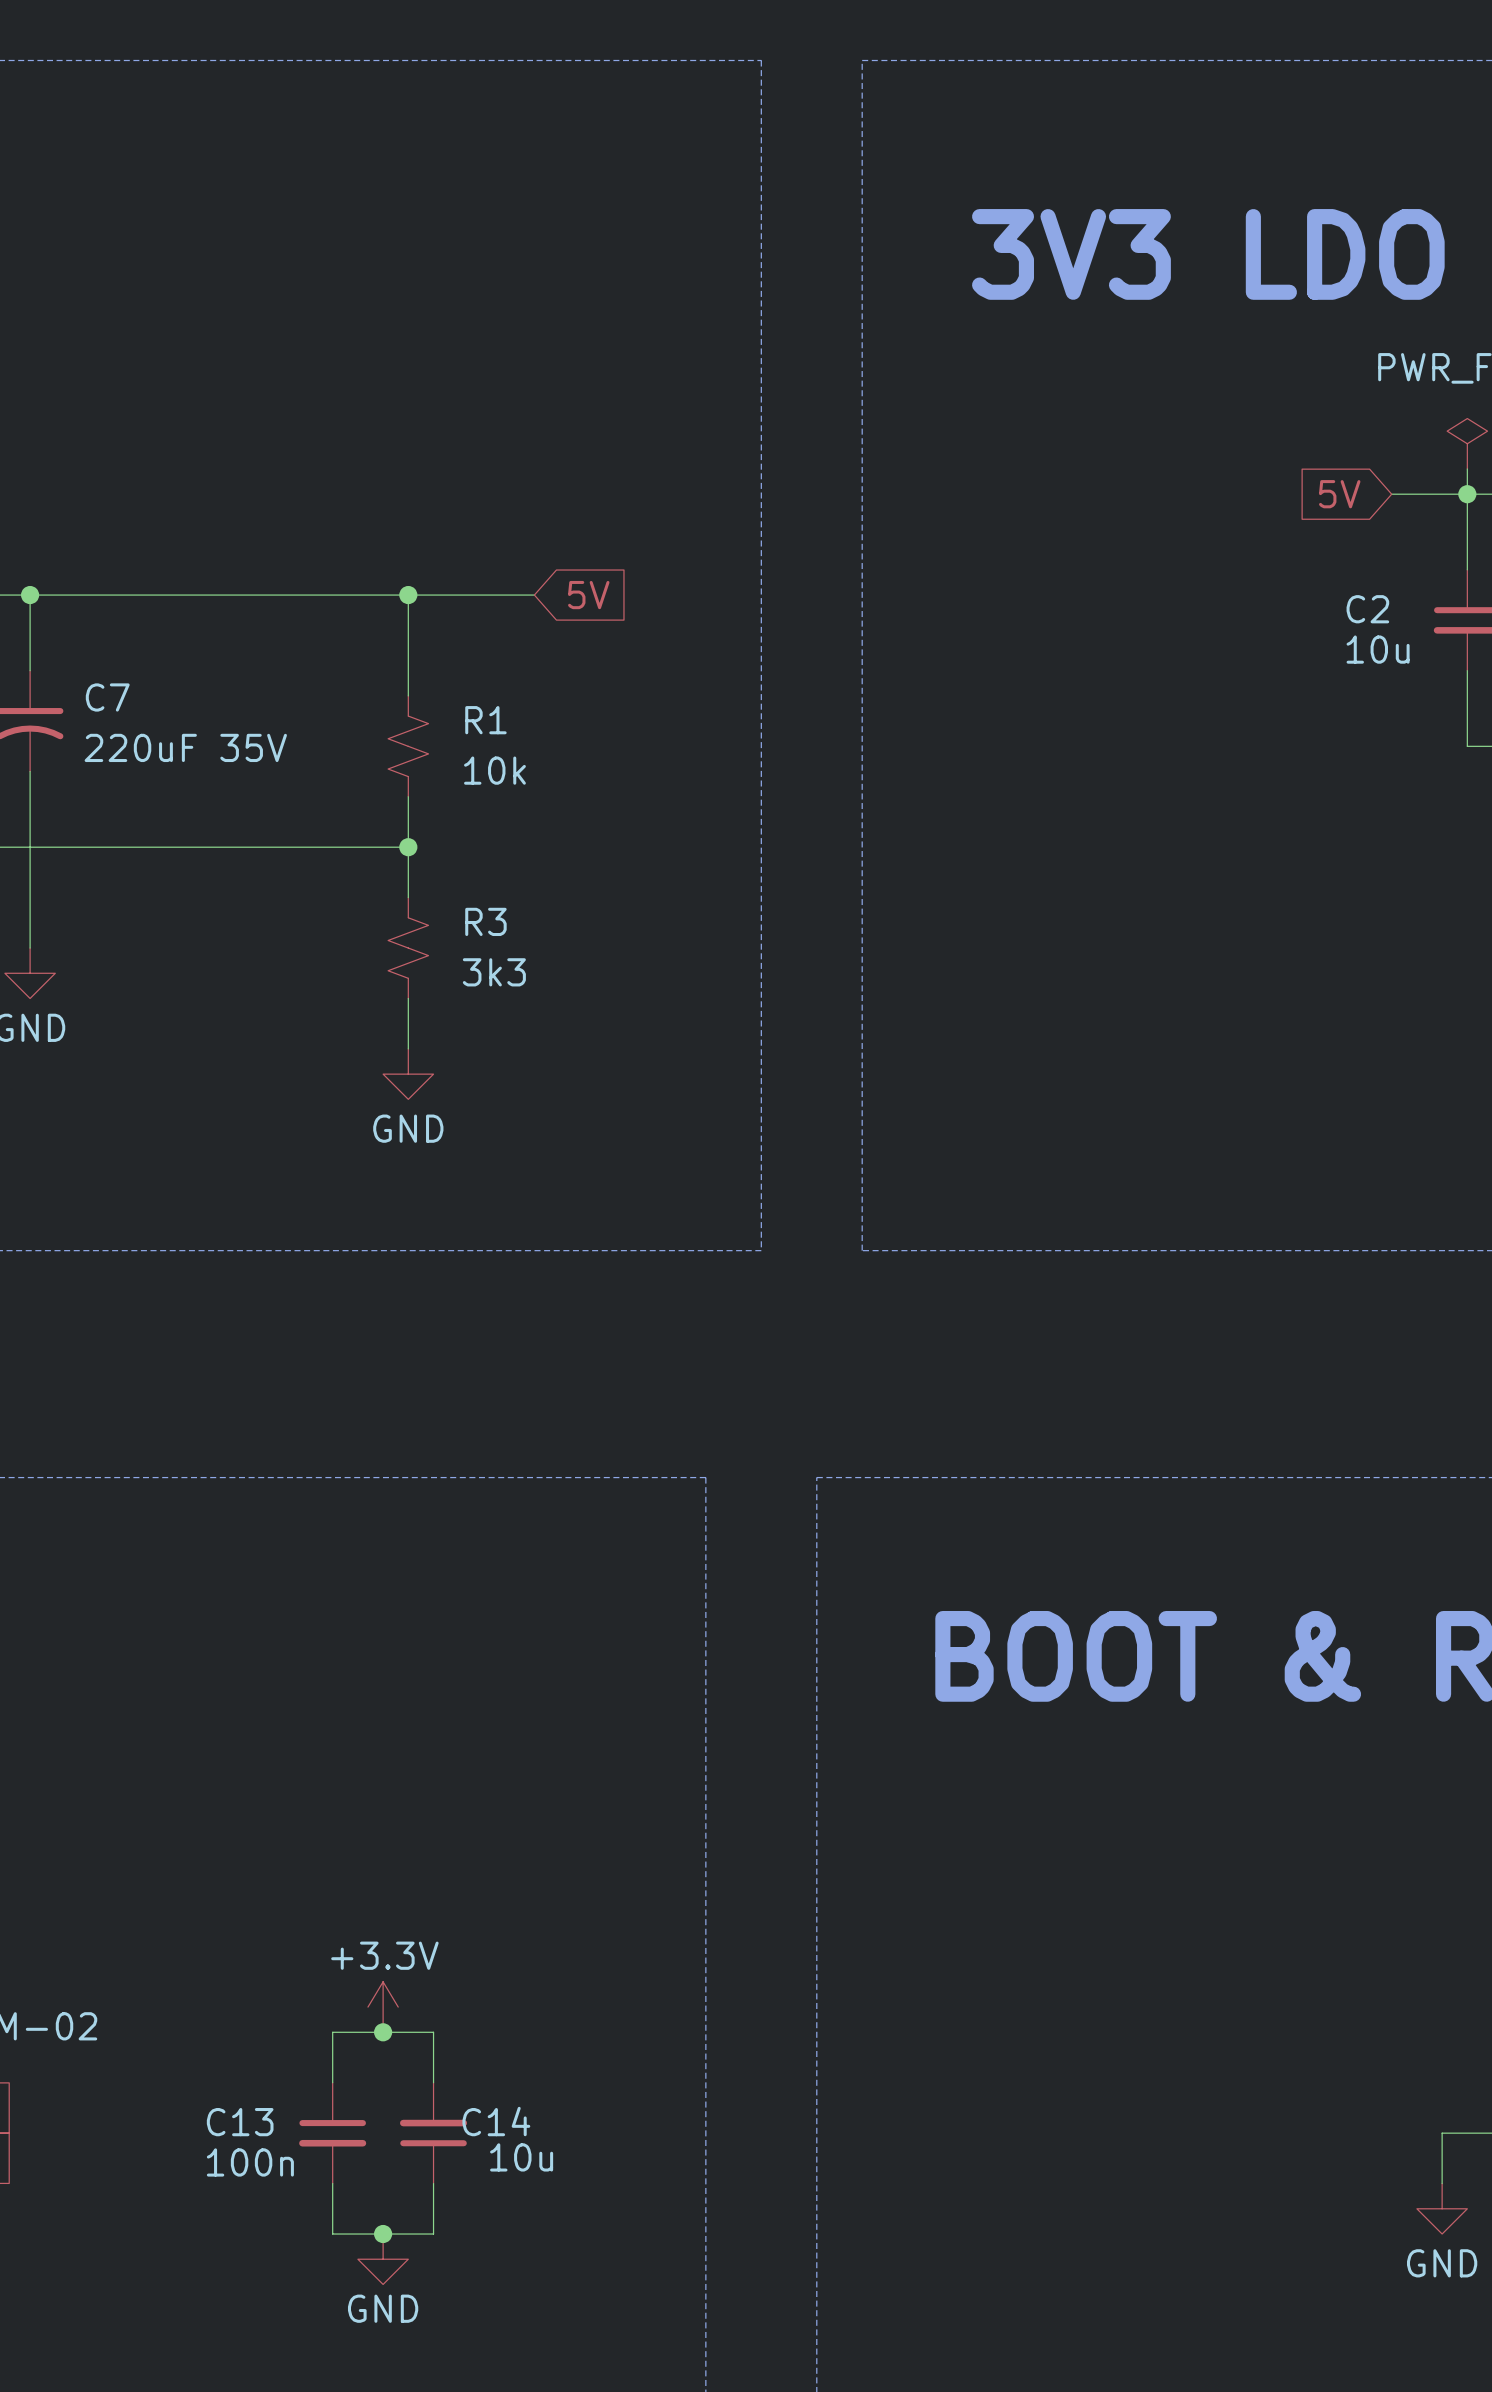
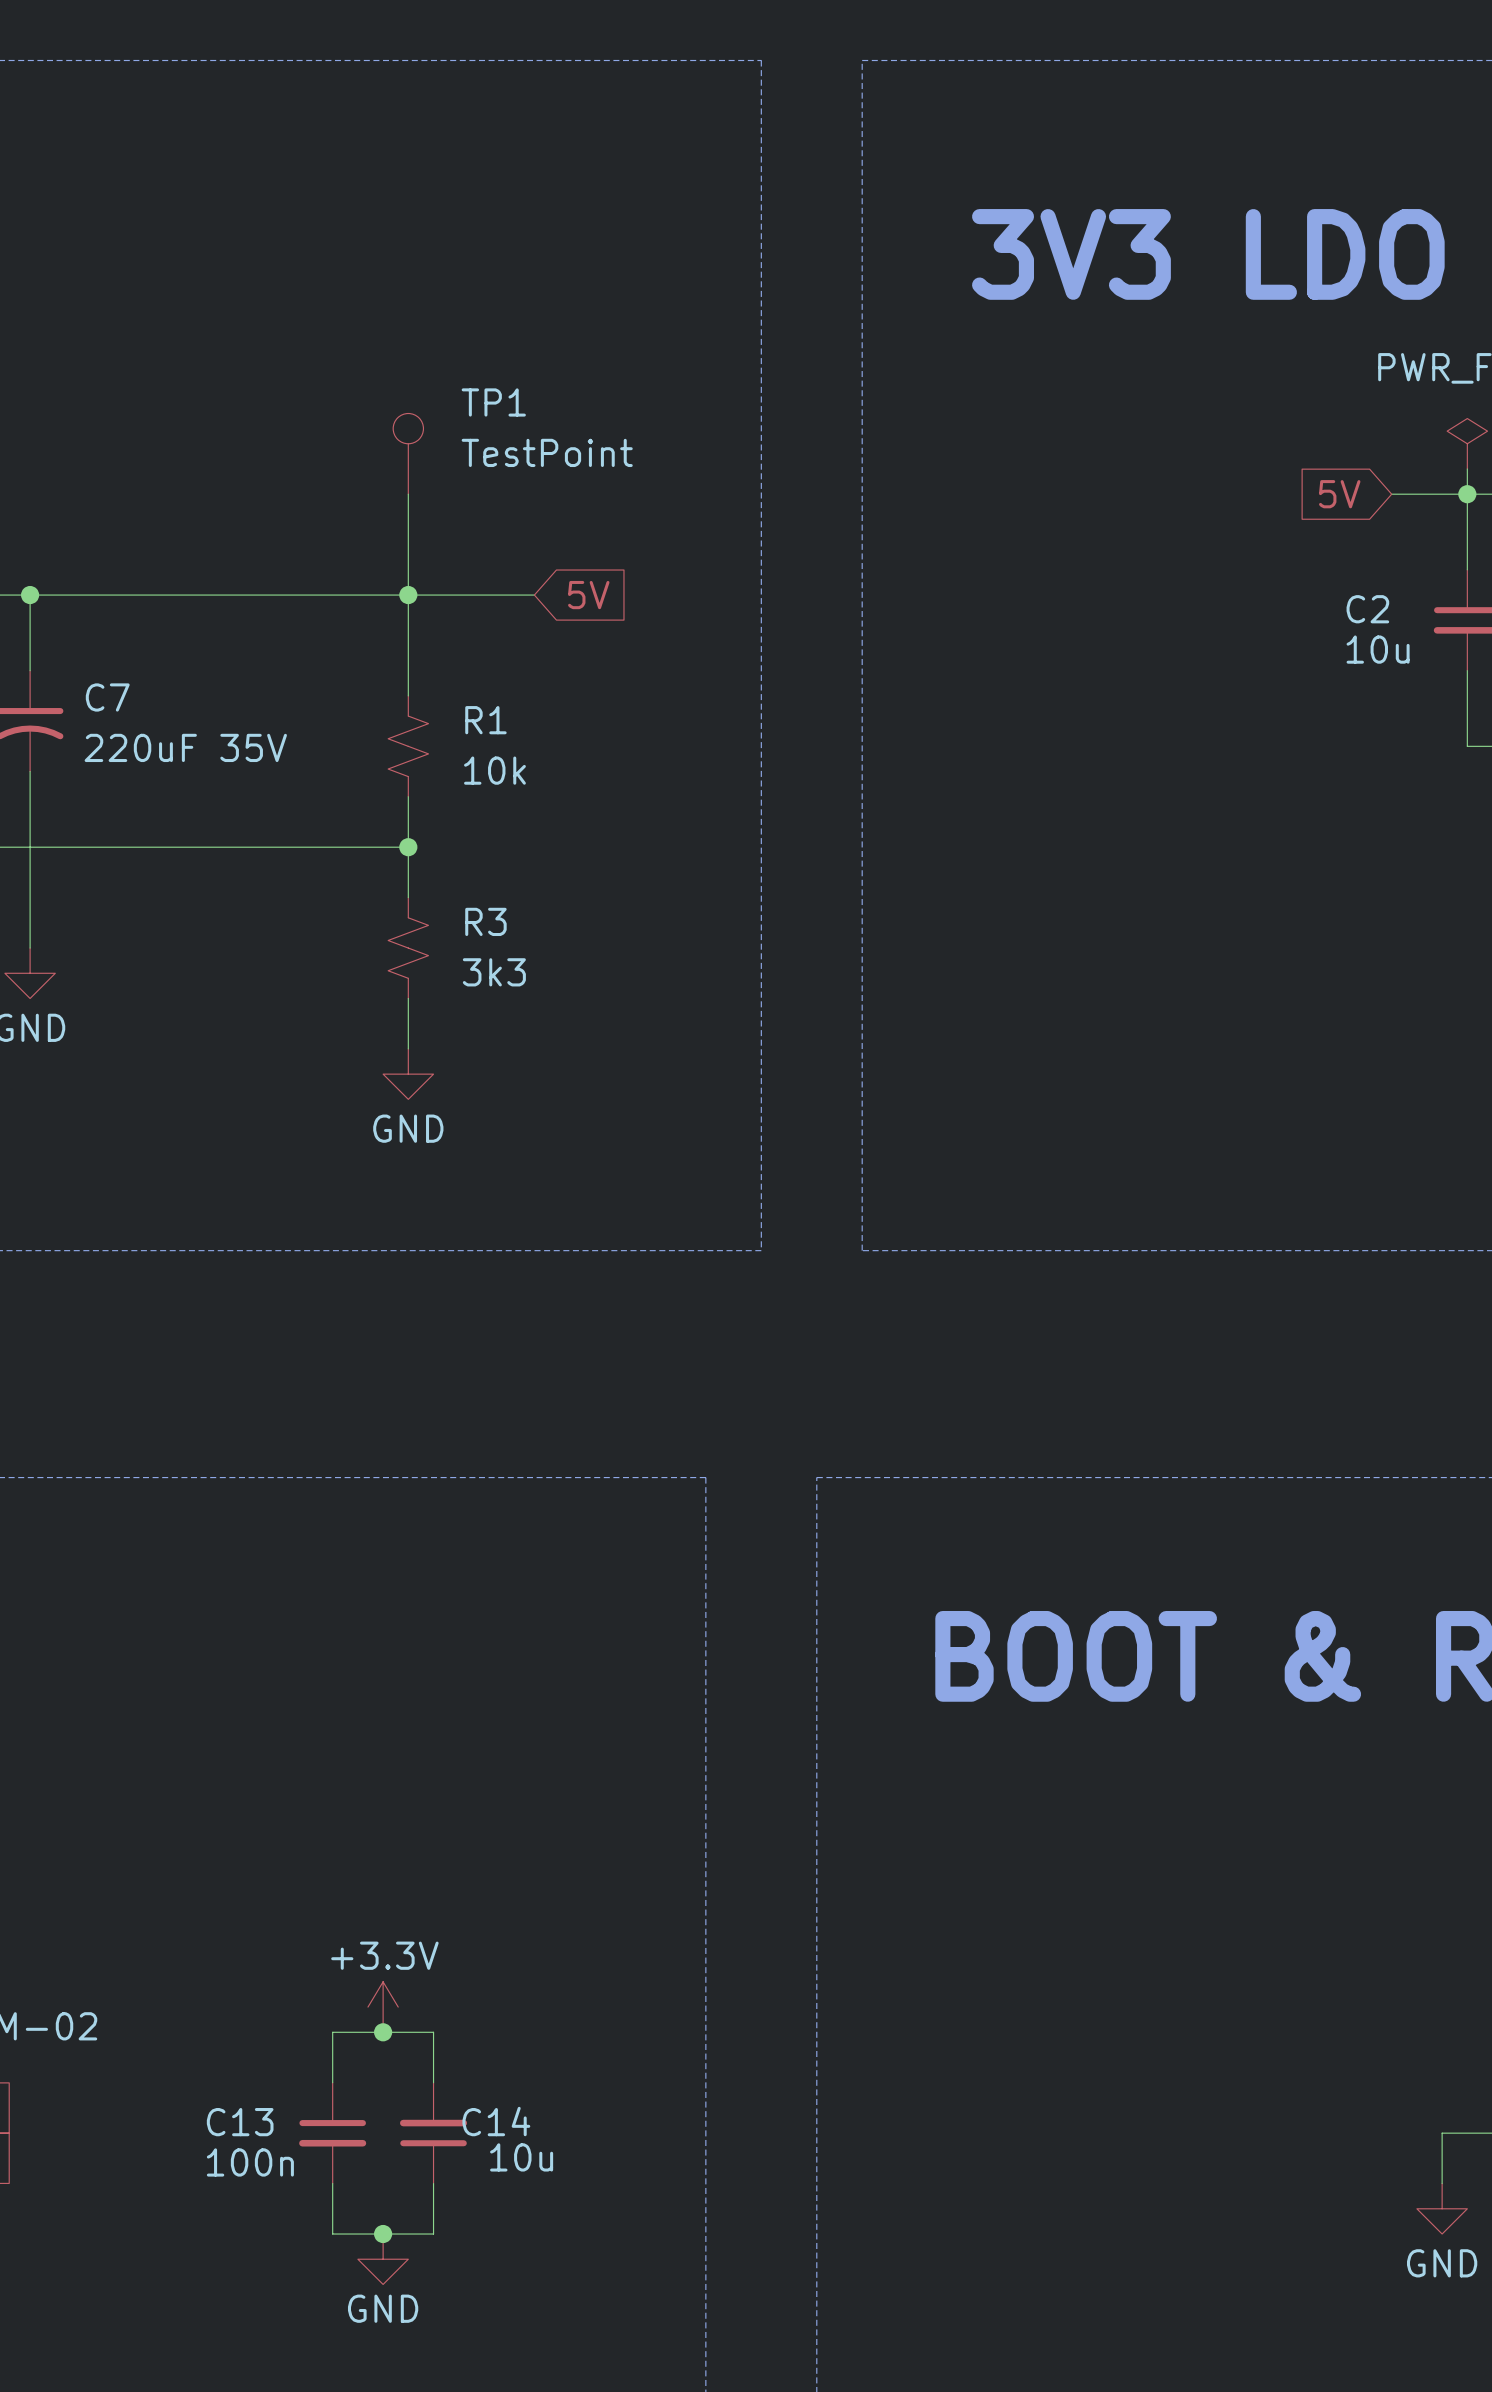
TP1: none -> TestPoint (408, 453)
wire: none -> (408, 494) (408, 595)

